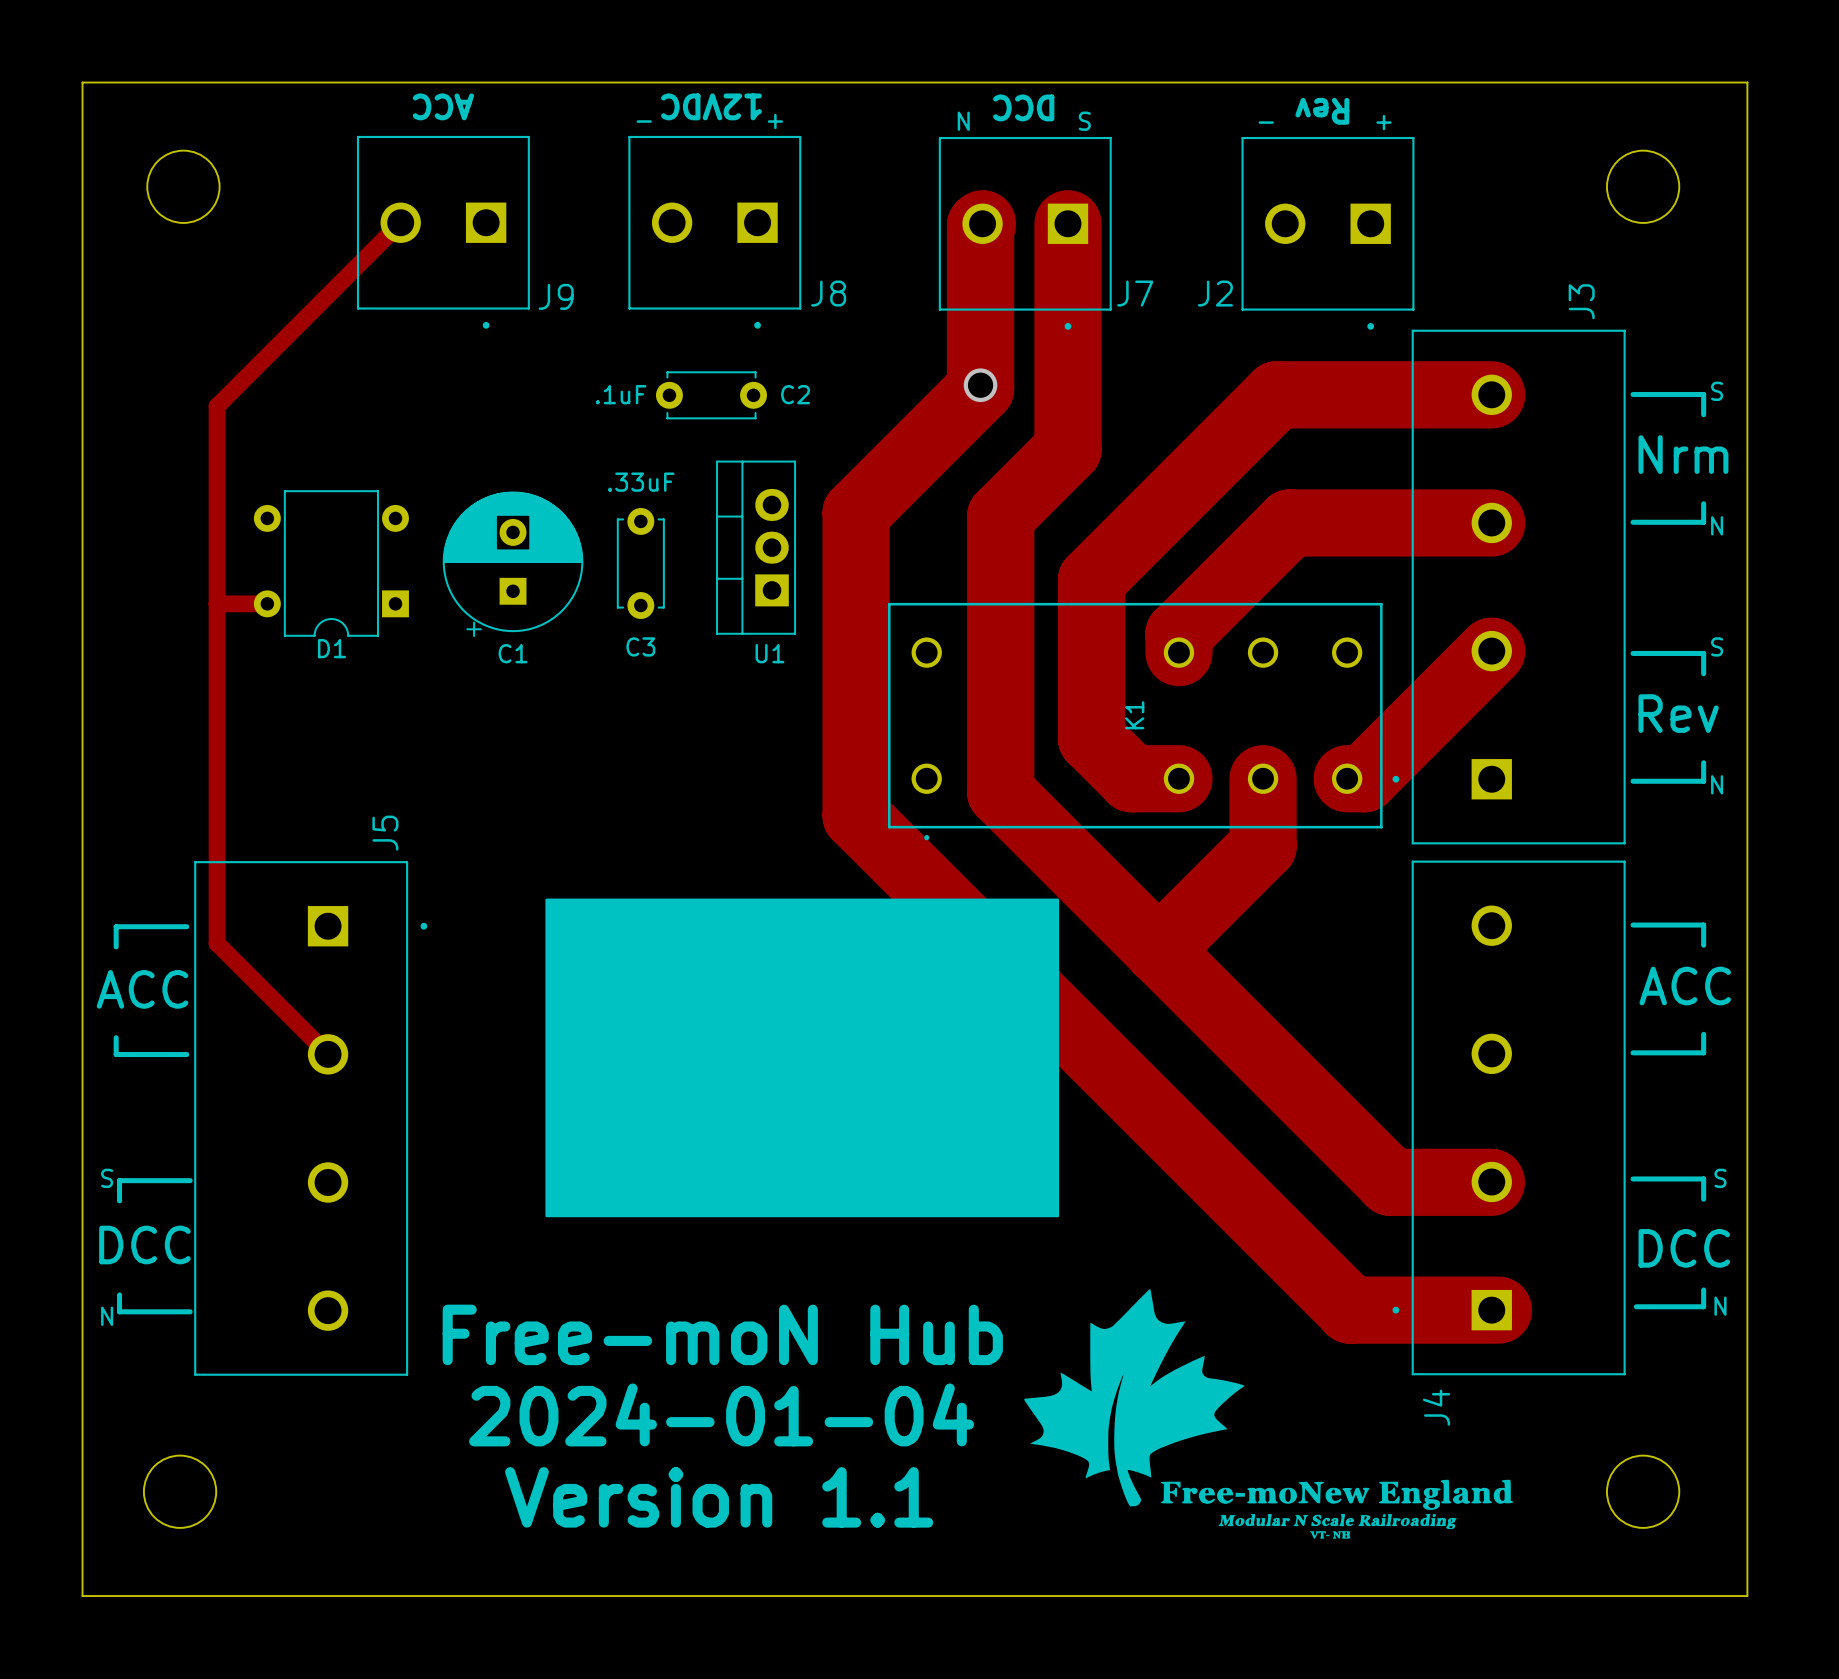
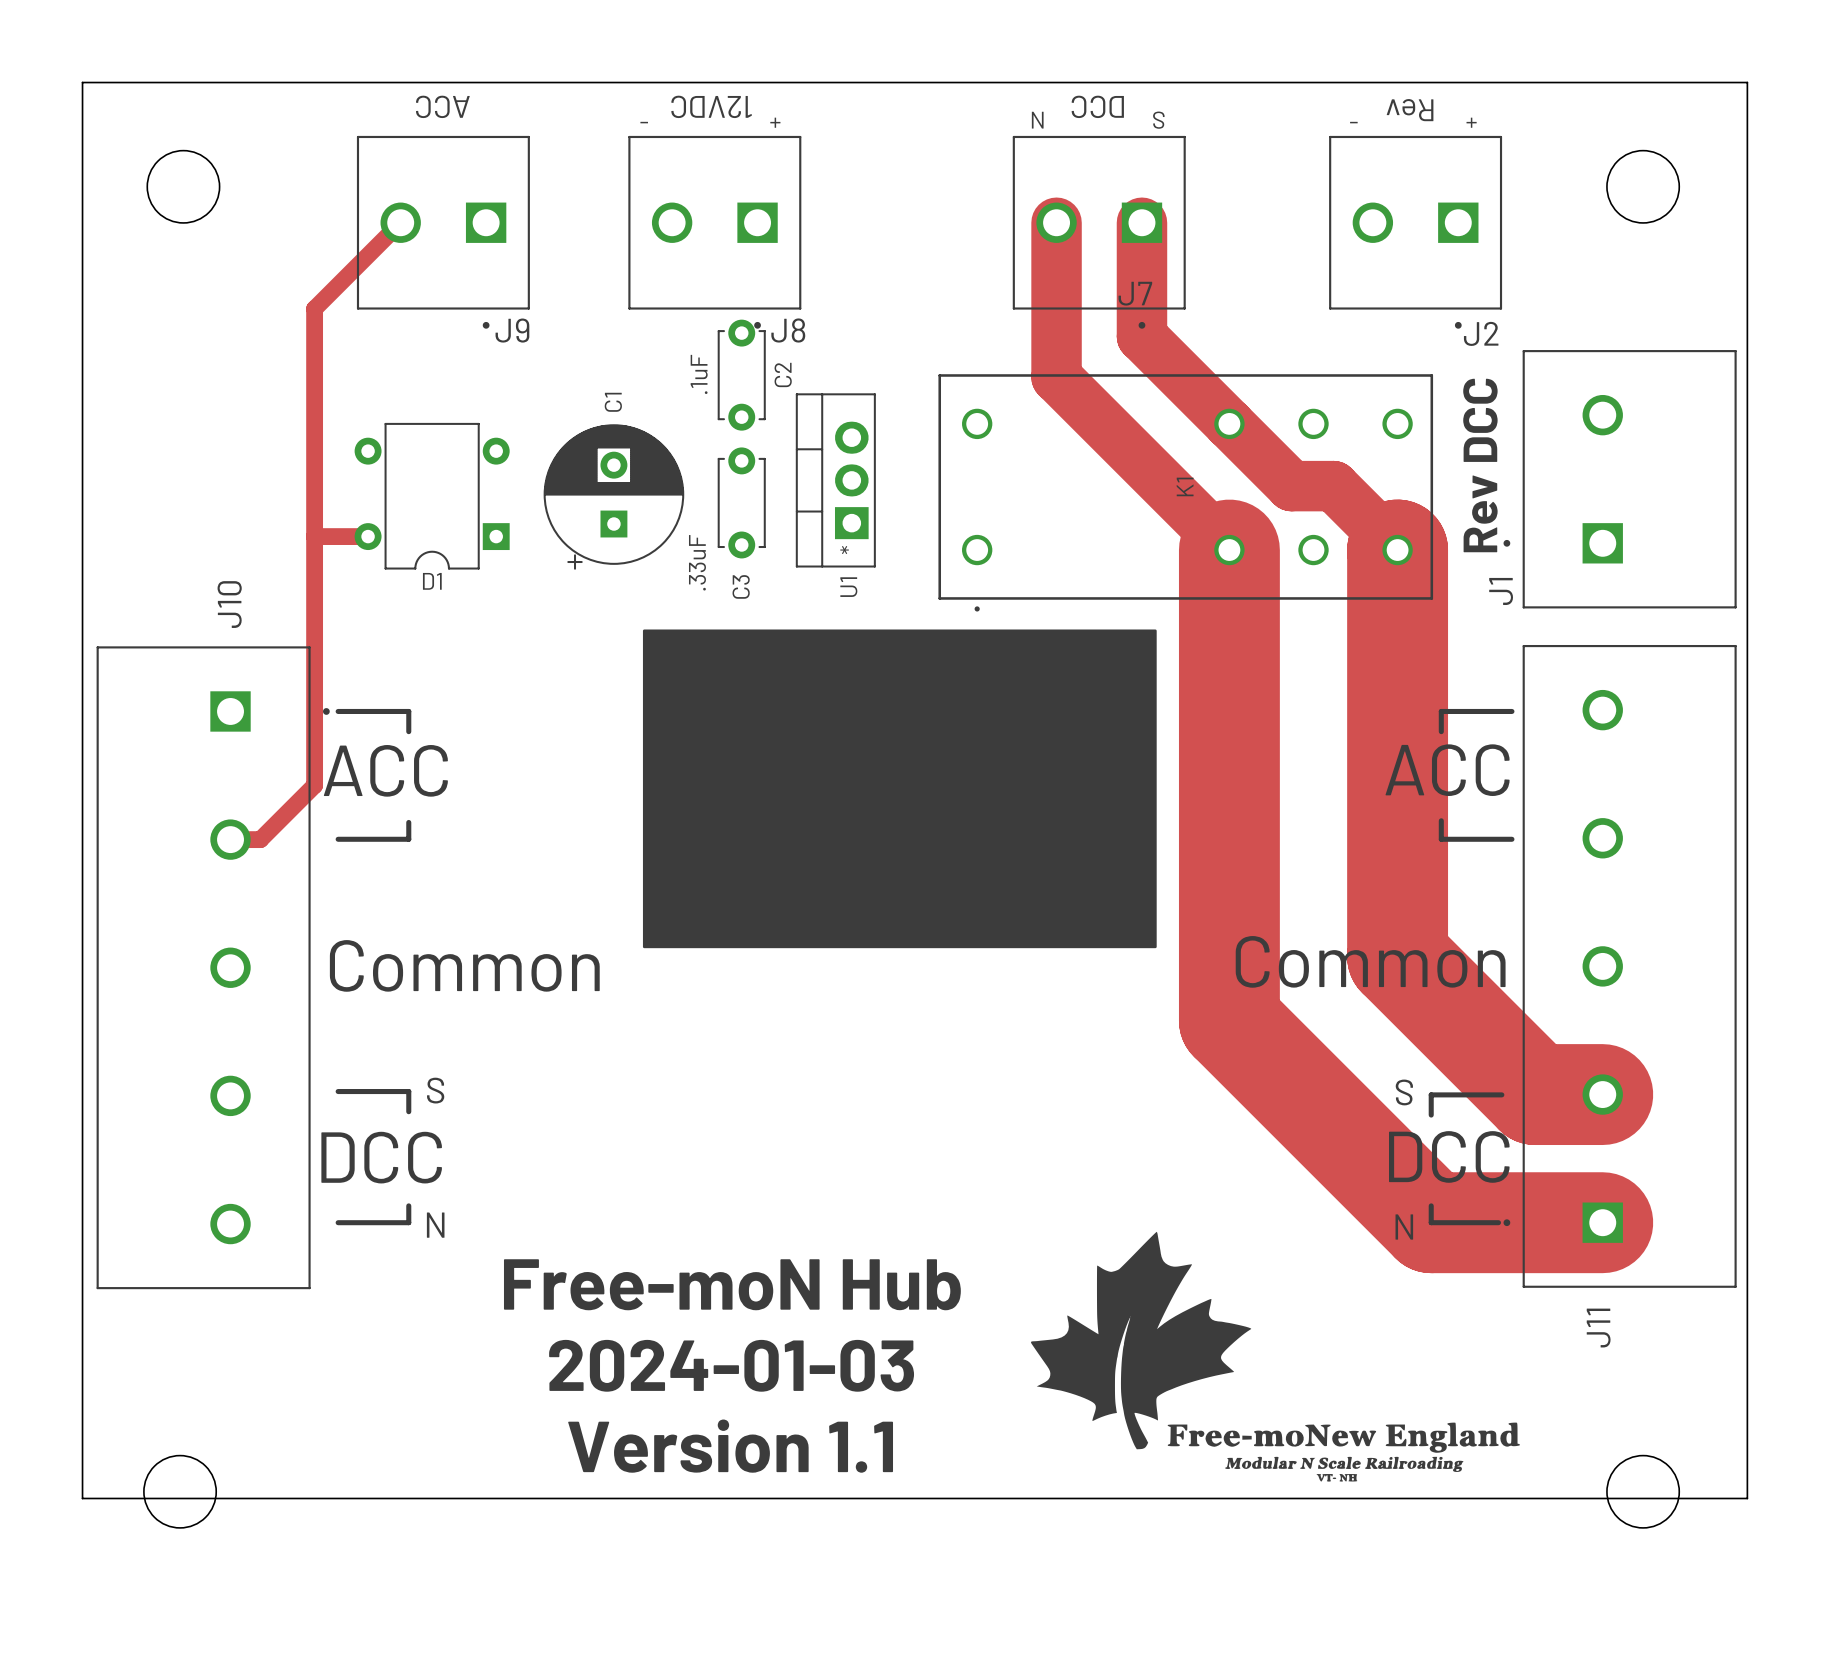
track: none -> (1141, 222) (1141, 336) (1291, 486) (1333, 486) (1397, 550) (1397, 956) (1535, 1094) (1602, 1094)
track: (982, 223) (980, 225) (980, 388) (856, 513) (856, 815) (1350, 1310) (1498, 1310) -> none
track: (1067, 223) (1067, 449) (1000, 516) (1000, 792) (1229, 1020) -> (1056, 222) (1056, 377) (1229, 550) (1229, 1020)
J7 position: (1025, 233) -> (1099, 232)
J2 position: (1327, 233) -> (1415, 232)
J8 name position: J8 (828, 293) -> J8 (788, 330)
J2 name position: J2 (1215, 293) -> J2 (1481, 333)
J9 name position: J9 (556, 296) -> J9 (512, 330)
track: (314, 308) (217, 406) (217, 943) (328, 1054) -> (314, 308) (314, 533)
via: (980, 385) -> none
C2 value position: .1uF (621, 394) -> .1uF (699, 374)
C2 name position: C2 (795, 394) -> C2 (783, 374)
track: (1491, 394) (1277, 394) (1091, 580) (1091, 738) (1131, 778) (1178, 778) -> none
line: (1633, 394) (1703, 394) (1703, 414) -> none
C2 rotation: 0° (711, 395) -> 90° clockwise (741, 375)
J1: none -> (1620, 479)
C3 value rotation: 0° (641, 482) -> 90° counterclockwise (697, 562)
C3 value position: .33uF (641, 482) -> .33uF (697, 562)
line: (1703, 503) (1703, 522) (1633, 522) -> none
track: (1491, 522) (1290, 522) (1178, 634) (1178, 652) -> none
track: none -> (368, 536) (314, 536) (314, 785) (260, 839) (230, 839)
U1 position: (756, 547) -> (835, 480)
K1 text: none -> * (844, 550)
D1 position: (331, 563) -> (432, 496)
C3 position: (640, 563) -> (741, 502)
C1 position: (513, 564) -> (613, 497)
J3: (1509, 587) -> none
track: (217, 603) (267, 603) -> none
C3 name rotation: 0° (640, 646) -> 90° counterclockwise (741, 586)
track: (1491, 651) (1364, 778) (1347, 778) -> none
C1 name rotation: 0° (513, 653) -> 90° counterclockwise (613, 402)
C1 name position: C1 (513, 653) -> C1 (613, 402)
U1 name rotation: 0° (769, 653) -> 90° counterclockwise (848, 587)
line: (1633, 653) (1703, 653) (1703, 673) -> none
line: none -> (338, 711) (408, 711) (408, 731)
line: none -> (1511, 711) (1441, 711) (1441, 731)
K1 position: (1135, 721) -> (1185, 492)
line: (1703, 762) (1703, 781) (1633, 781) -> none
track: (1263, 778) (1263, 846) (1158, 950) -> none
line: none -> (1441, 820) (1441, 839) (1511, 839)
line: none -> (408, 822) (408, 839) (338, 839)
line: (1633, 925) (1703, 925) (1703, 945) -> none
line: (186, 926) (116, 926) (116, 946) -> none
J11: none -> (1620, 966)
J10: none -> (213, 967)
track width: thin (1229, 1020) (1390, 1182) -> thick (1229, 1020) (1390, 1182)
line: (1703, 1034) (1703, 1052) (1633, 1052) -> none
line: (116, 1037) (116, 1054) (186, 1054) -> none
drawing position: (802, 1057) -> (899, 788)
line: none -> (338, 1091) (408, 1091) (408, 1111)
line: none -> (1501, 1094) (1431, 1094) (1431, 1115)
J4: (1509, 1117) -> none
J5: (310, 1118) -> none
line: (1633, 1178) (1703, 1178) (1703, 1199) -> none
line: (190, 1180) (119, 1180) (119, 1200) -> none
track: (1390, 1182) (1491, 1182) -> (1390, 1182) (1431, 1222) (1602, 1222)
line: none -> (408, 1205) (408, 1222) (338, 1222)
line: none -> (1431, 1205) (1431, 1222) (1498, 1222)
line: (1703, 1289) (1703, 1306) (1636, 1306) -> none
line: (119, 1295) (119, 1311) (190, 1311) -> none
text position: Free-moN Hub (722, 1334) -> Free-moN Hub (732, 1284)
drawing position: (1268, 1413) -> (1275, 1356)
text: 2024-01-04 (721, 1414) -> 2024-01-03 (731, 1365)
text position: Version 1.1 (719, 1497) -> Version 1.1 (730, 1446)
board edge: (82, 1498) (82, 1596) (1747, 1596) (1747, 1498) -> (82, 1498) (1747, 1498)

